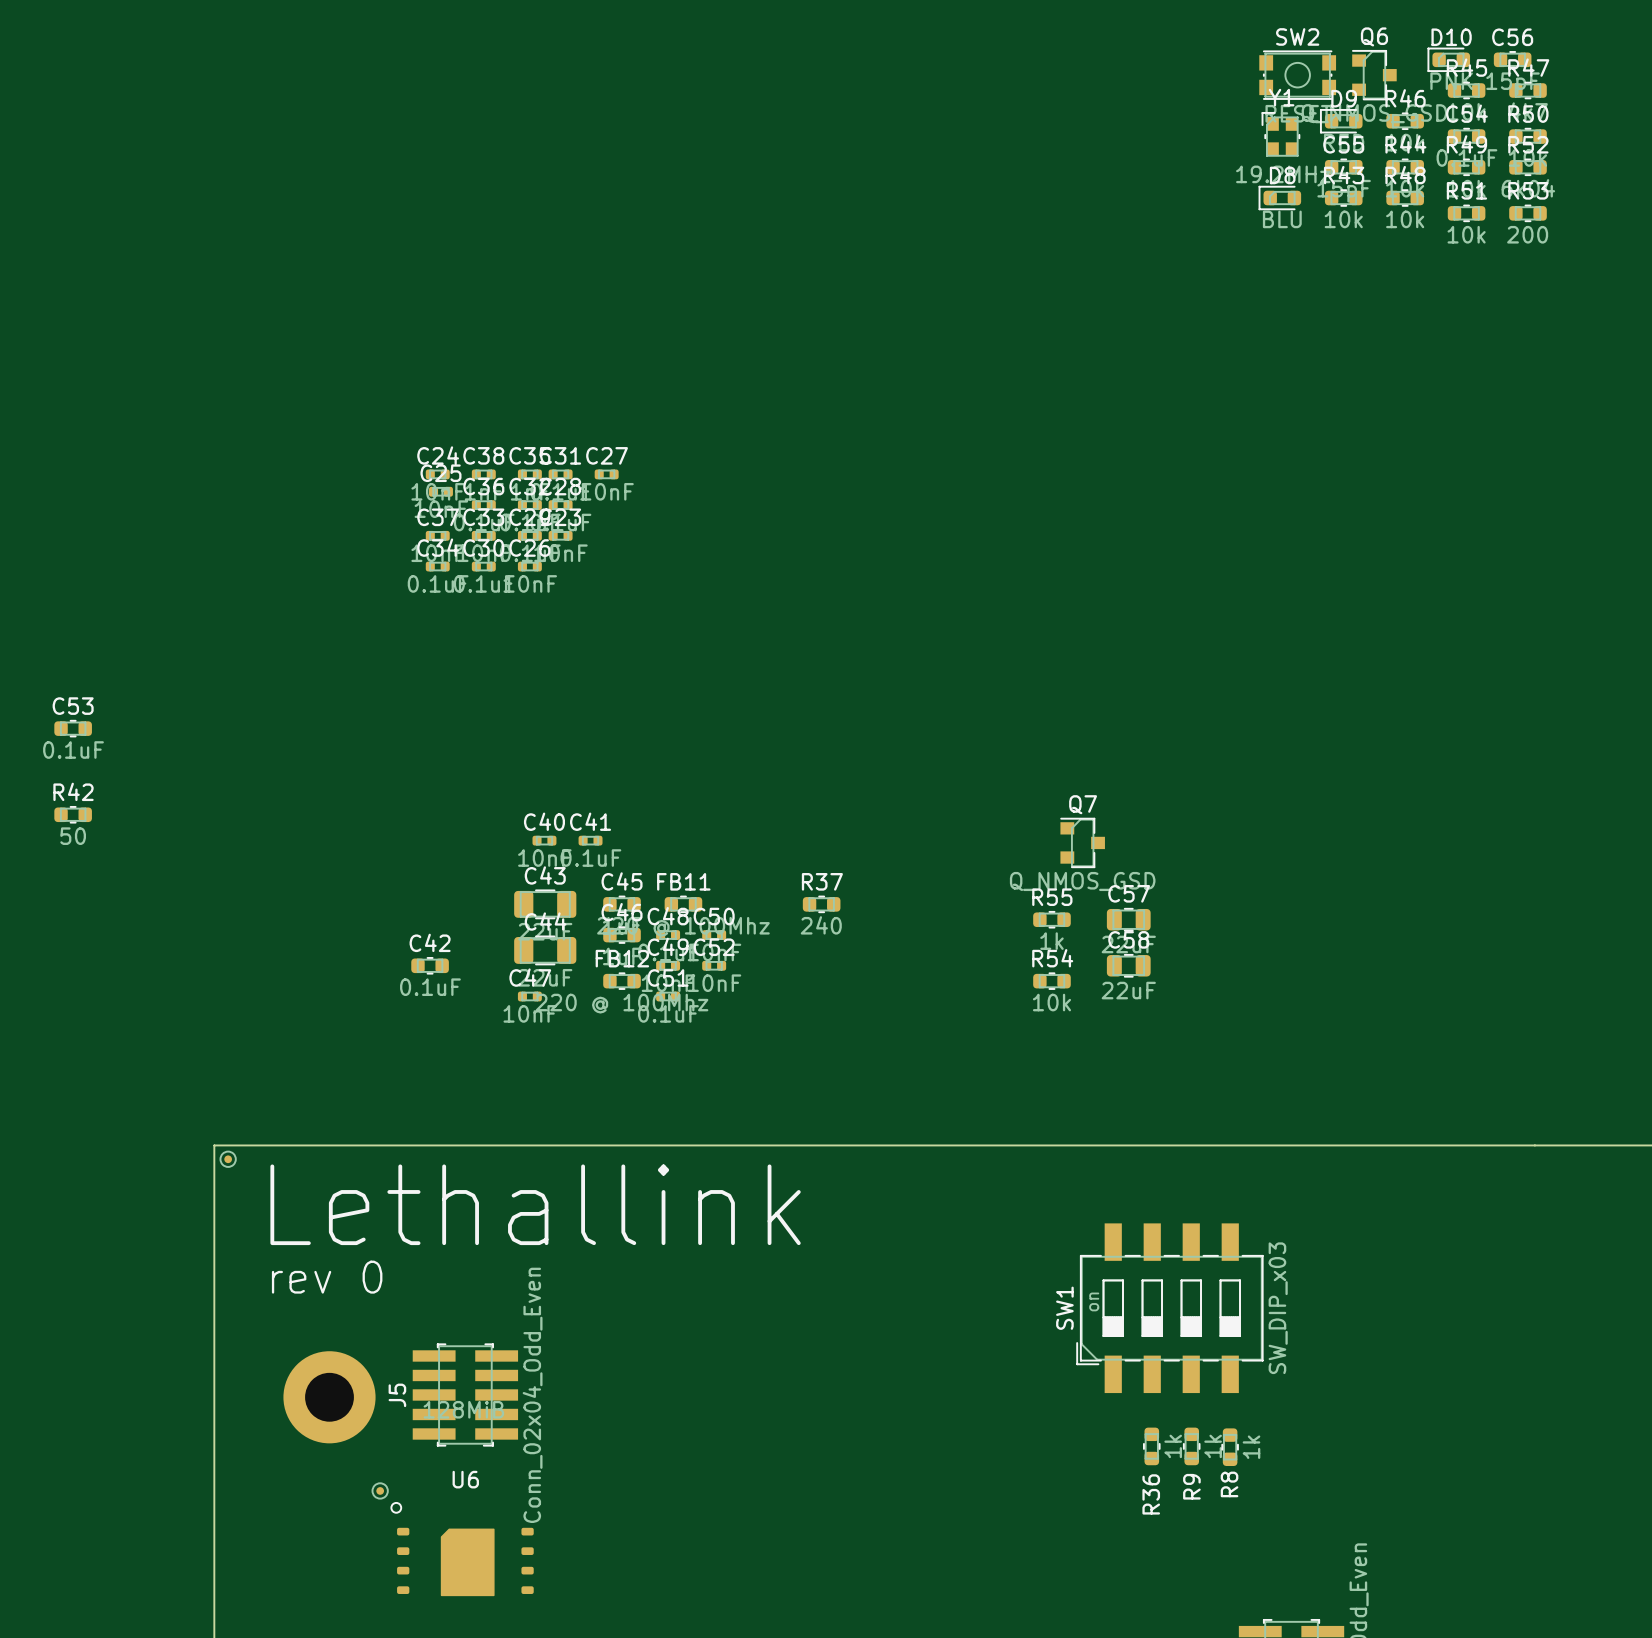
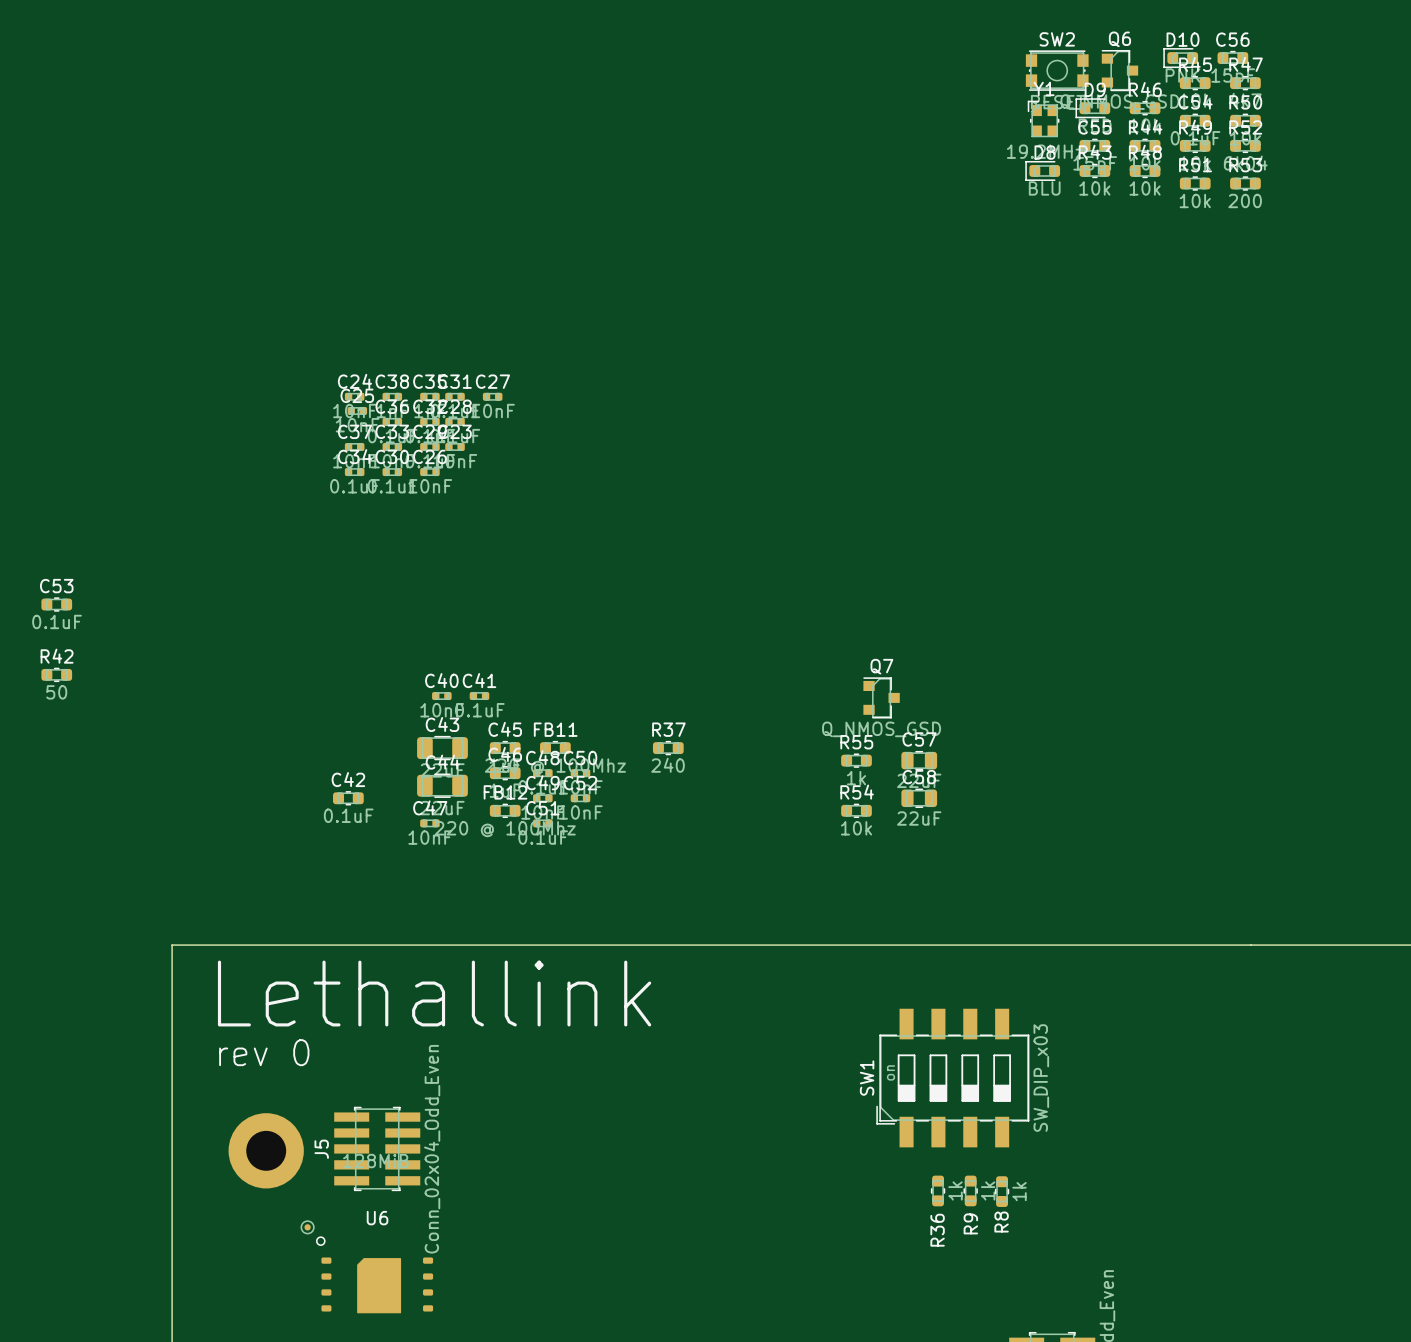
part: (228, 1159) -> none

